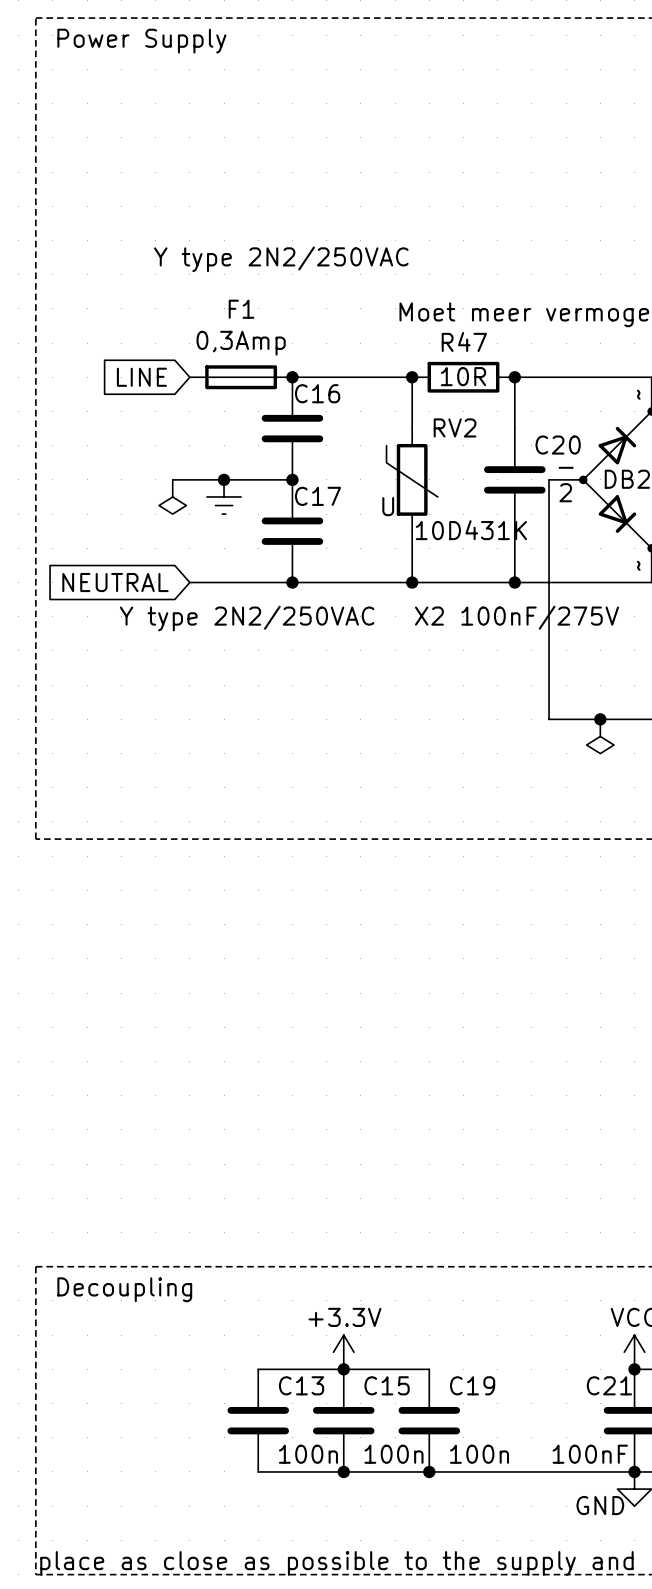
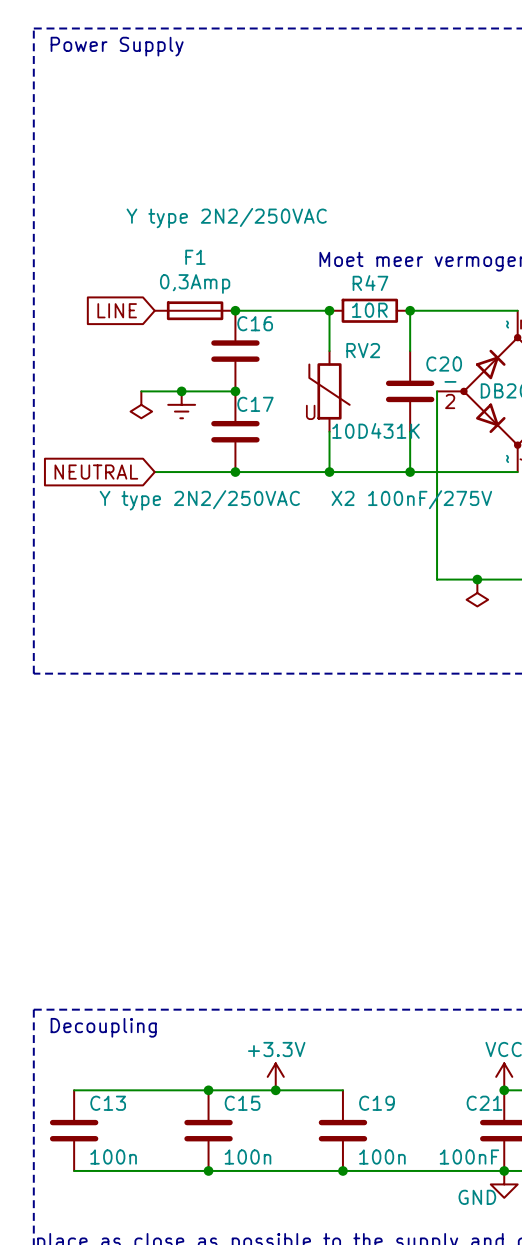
wire: none -> (74, 1090) (208, 1090)
junction: none -> (208, 1090)
C13 name: C13 (301, 1385) -> C15 (242, 1103)
C13: none -> 100n (74, 1130)
C15: 100n (343, 1420) -> none
wire: none -> (74, 1170) (208, 1170)
junction: none -> (208, 1170)
junction: (343, 1471) -> none

